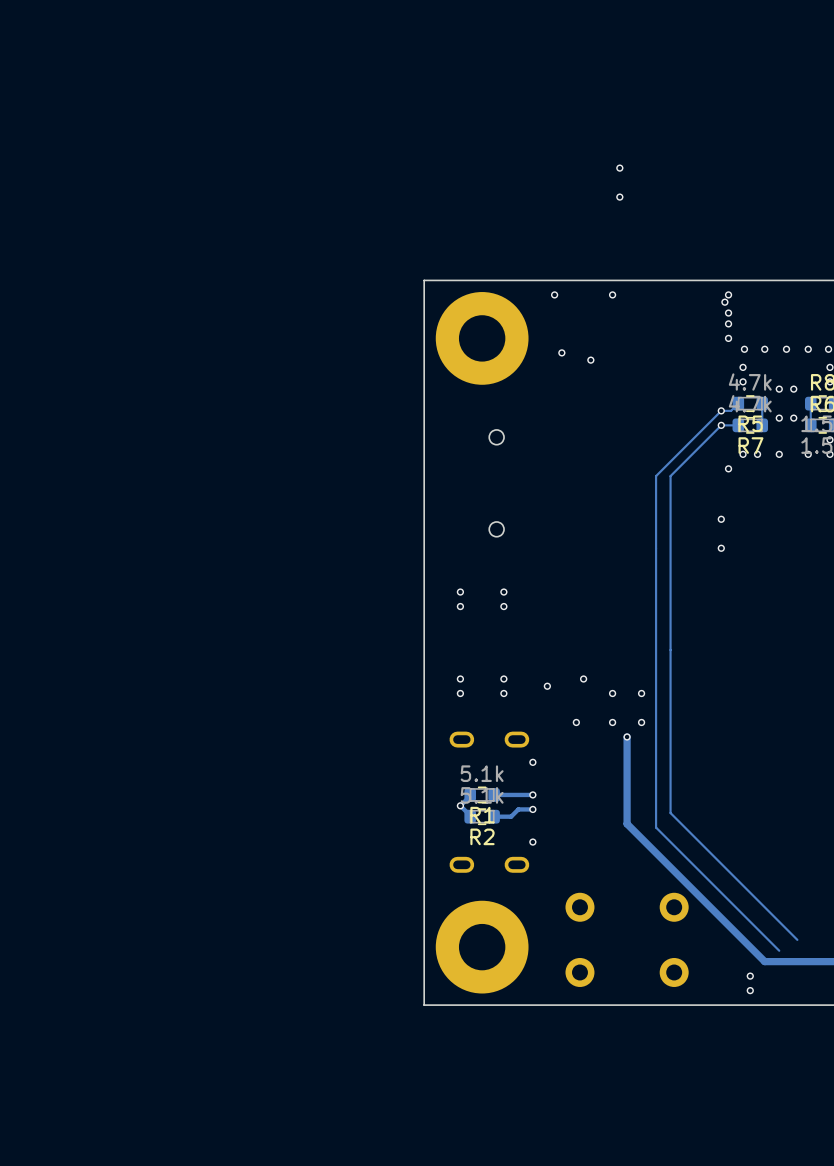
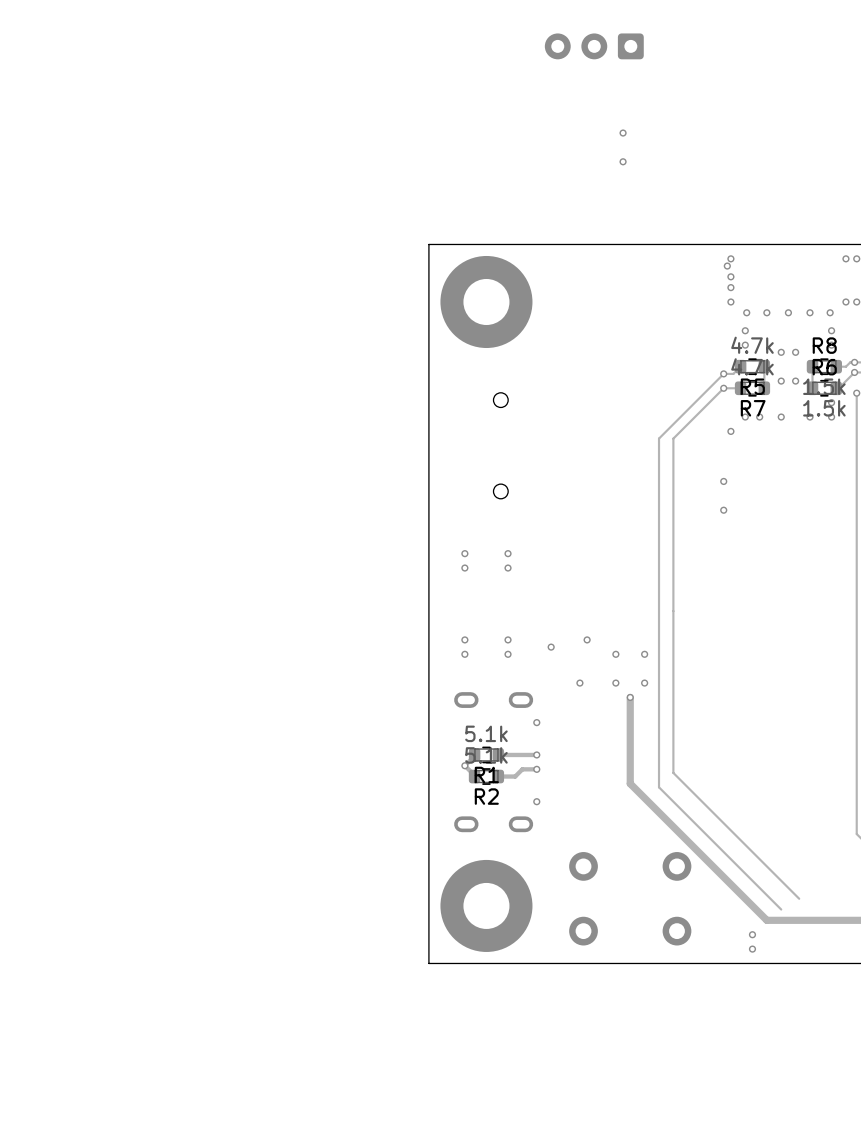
part: none -> (594, 46)
via: (554, 294) -> none
via: (612, 294) -> none
via: (561, 352) -> none
via: (590, 360) -> none

